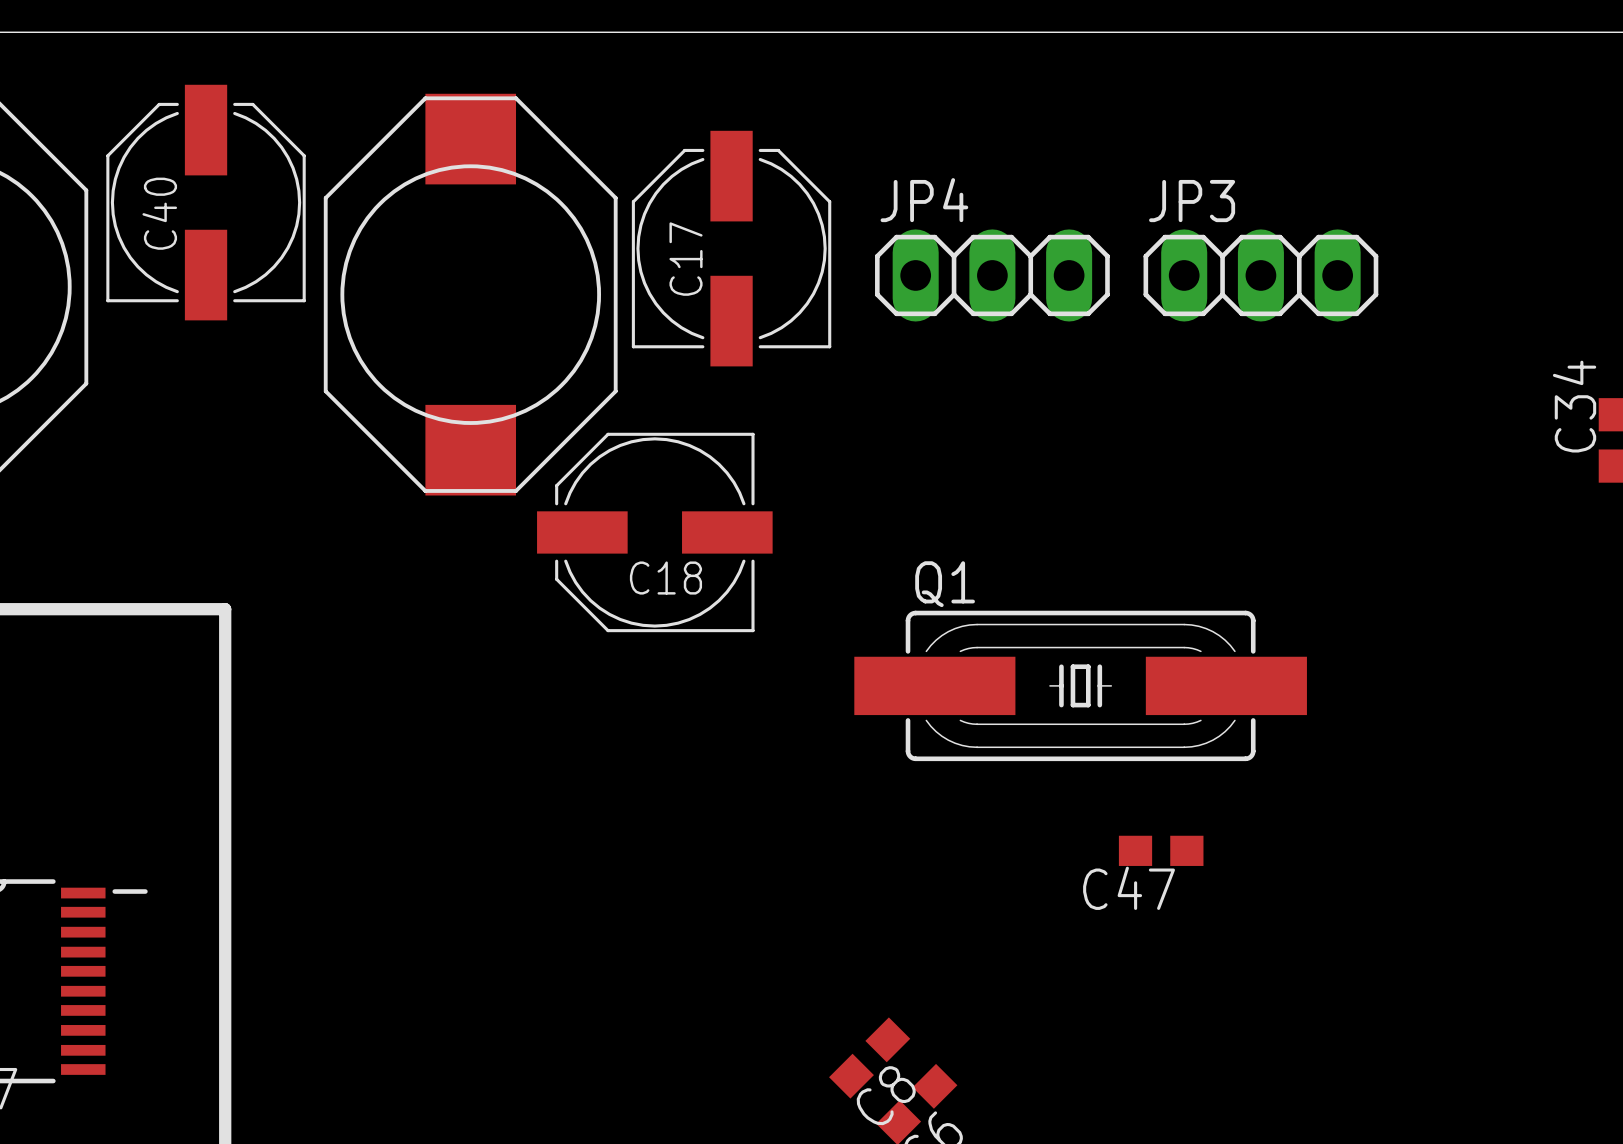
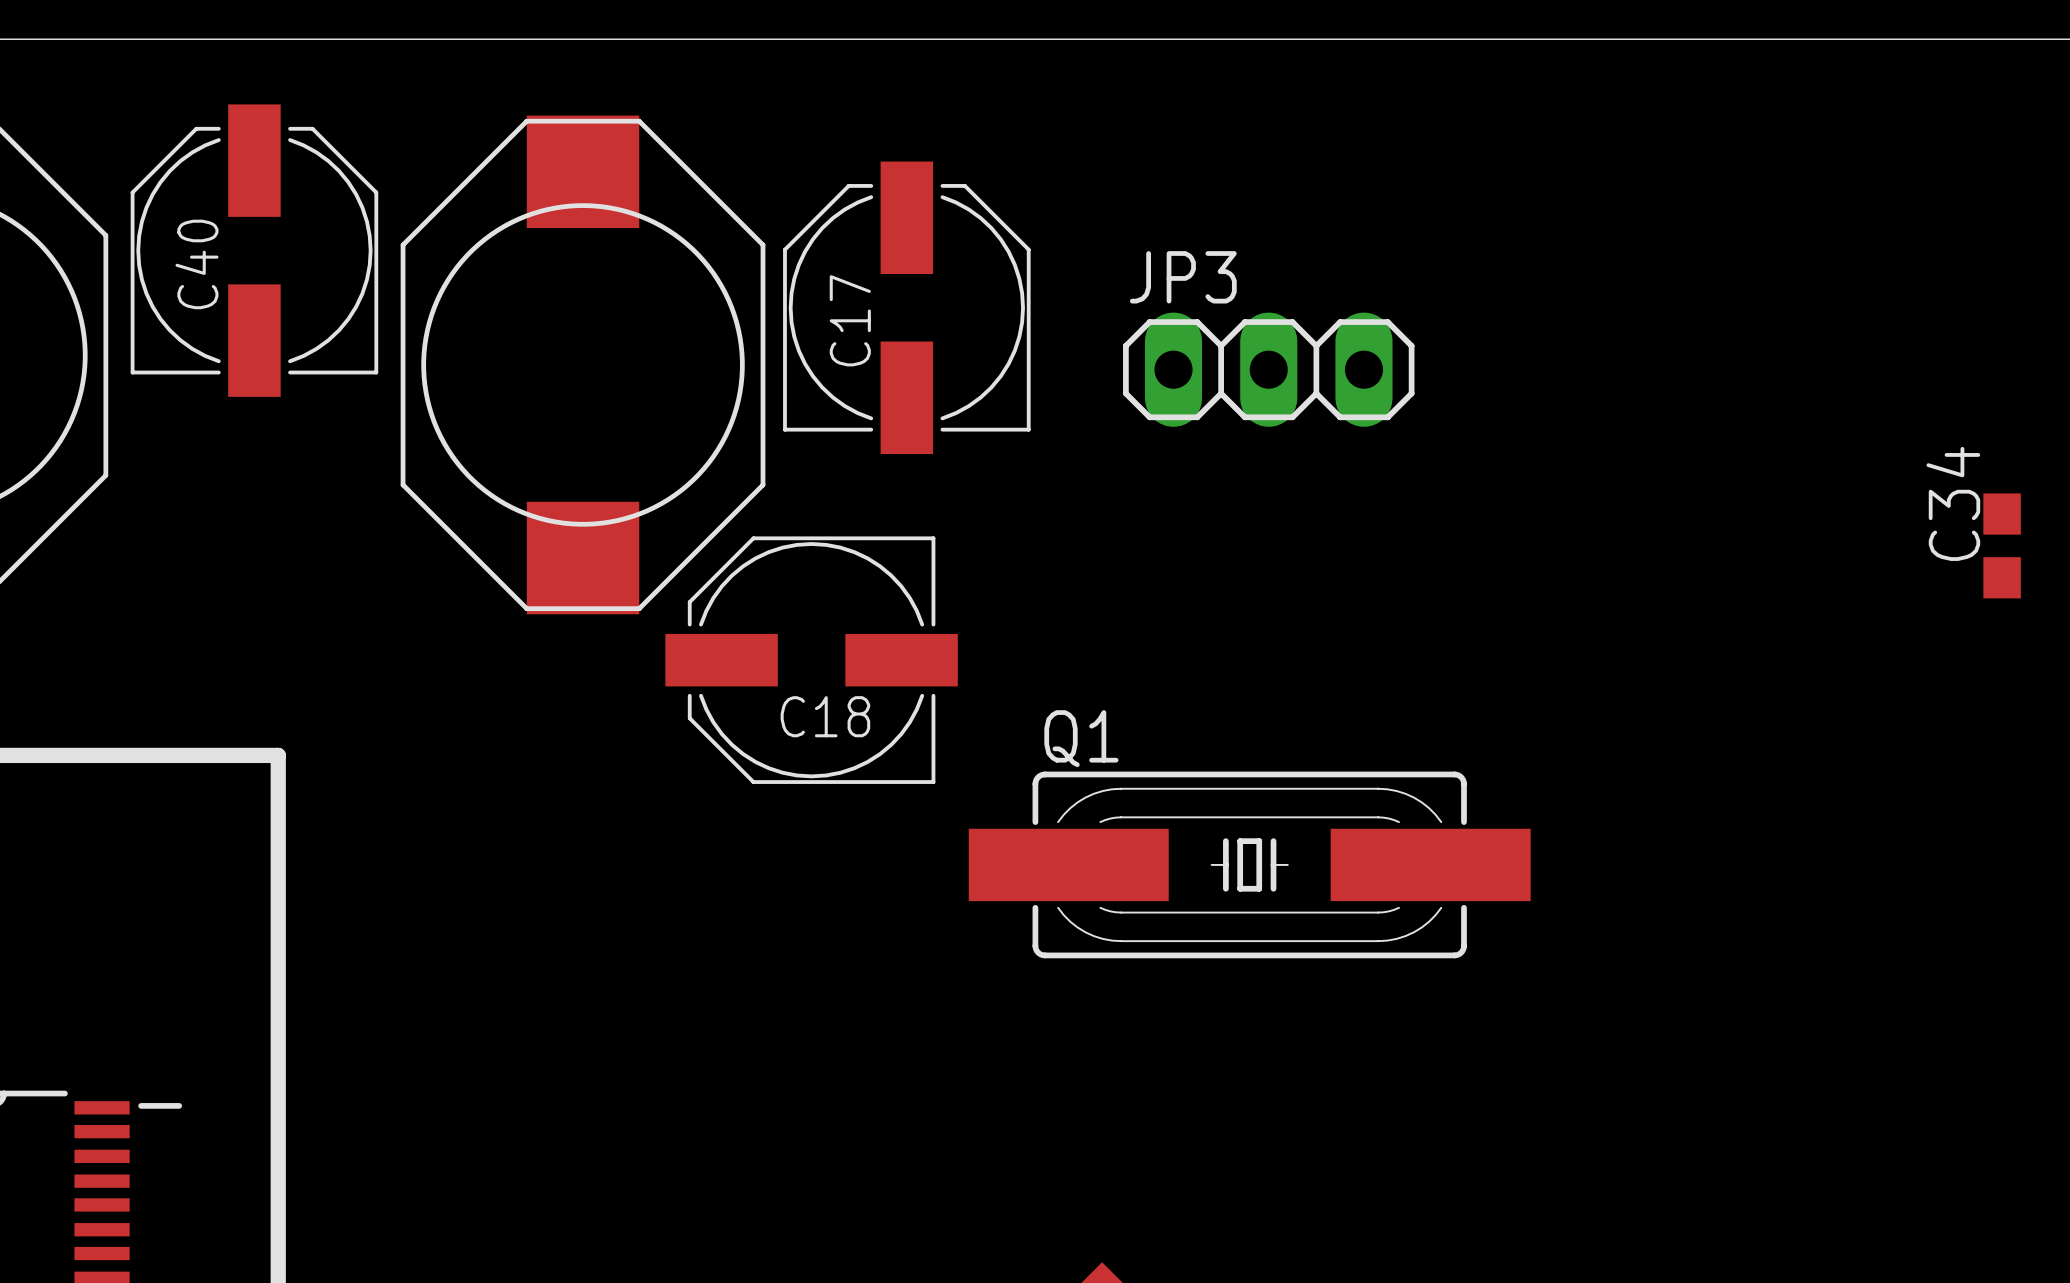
JP4: (992, 275) -> none
JP3 position: (1260, 275) -> (1268, 369)
Q1 position: (1080, 685) -> (1249, 864)
C47: (1161, 850) -> none

